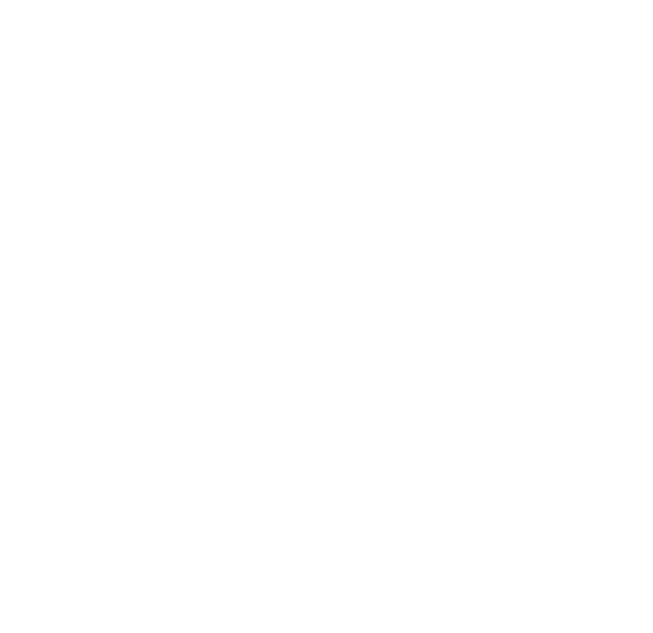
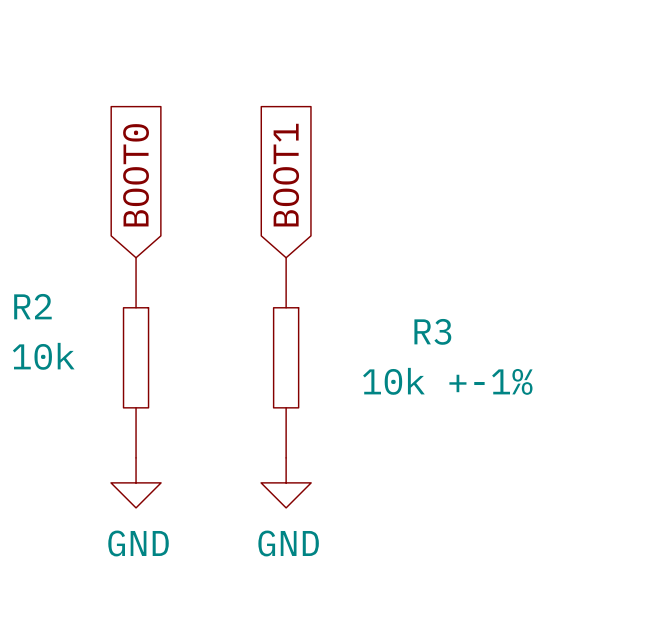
global label: none -> BOOT0 (136, 175)
global label: none -> BOOT1 (286, 175)
R2: none -> 10k (136, 357)
R3: none -> 10k +-1% (286, 357)
power symbol: none -> GND (136, 482)
power symbol: none -> GND (286, 482)

